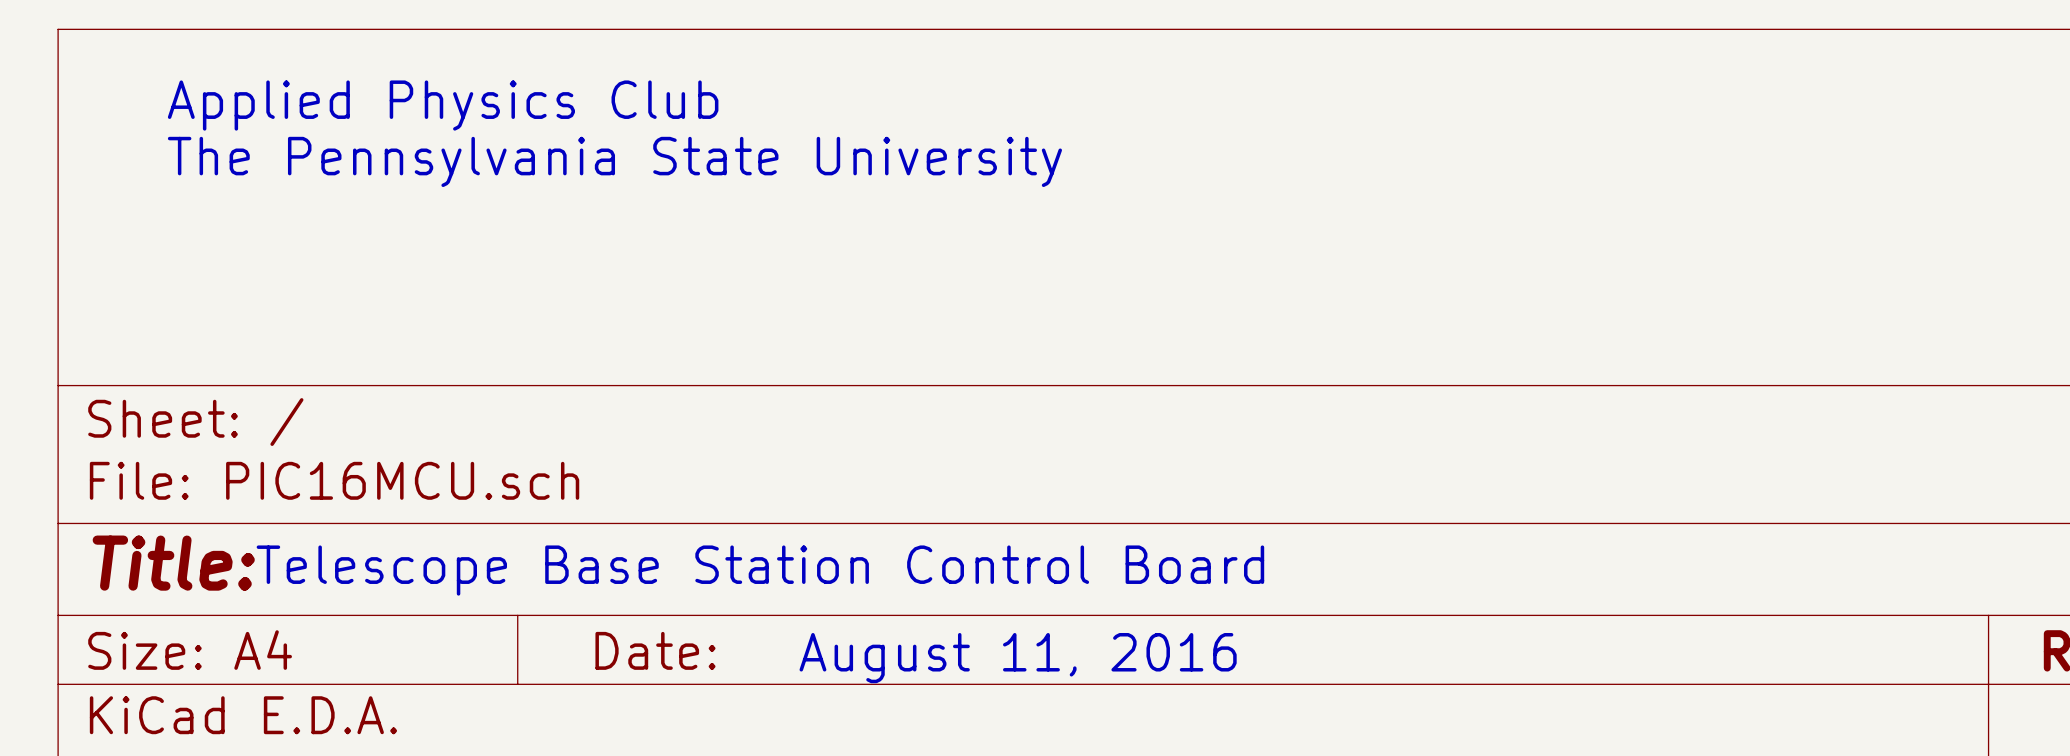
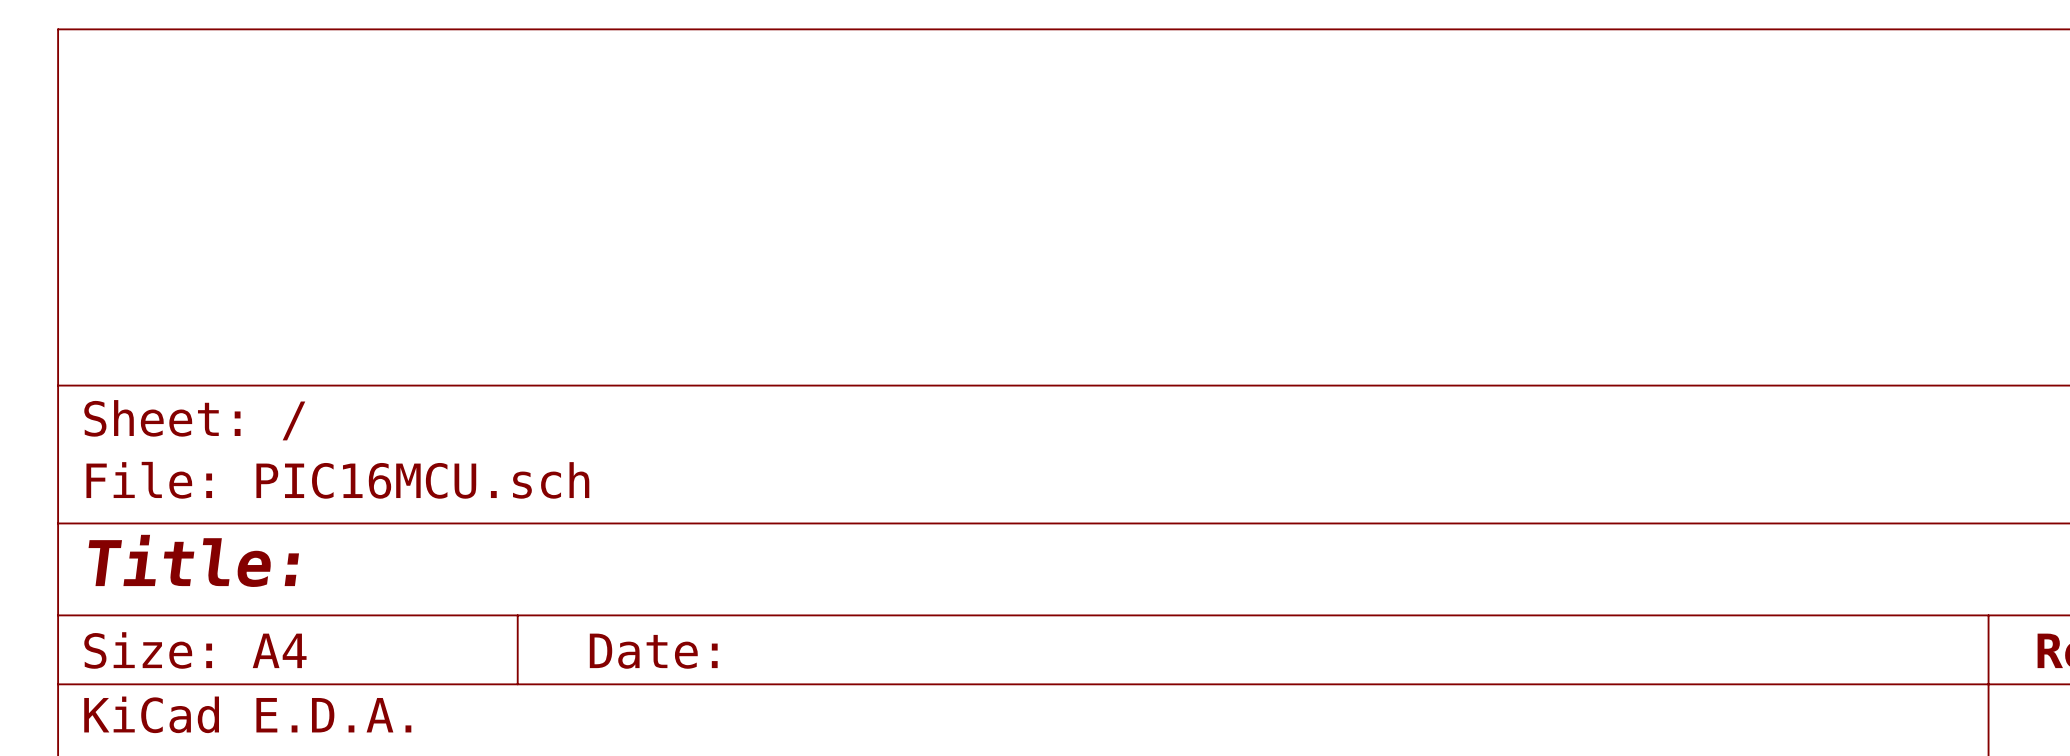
text: Applied Physics Club (443, 105) -> none
text: The Pennsylvania State University (614, 161) -> none
text: Telescope Base Station Control Board (760, 570) -> none
text: August 11, 2016 (1018, 658) -> none

